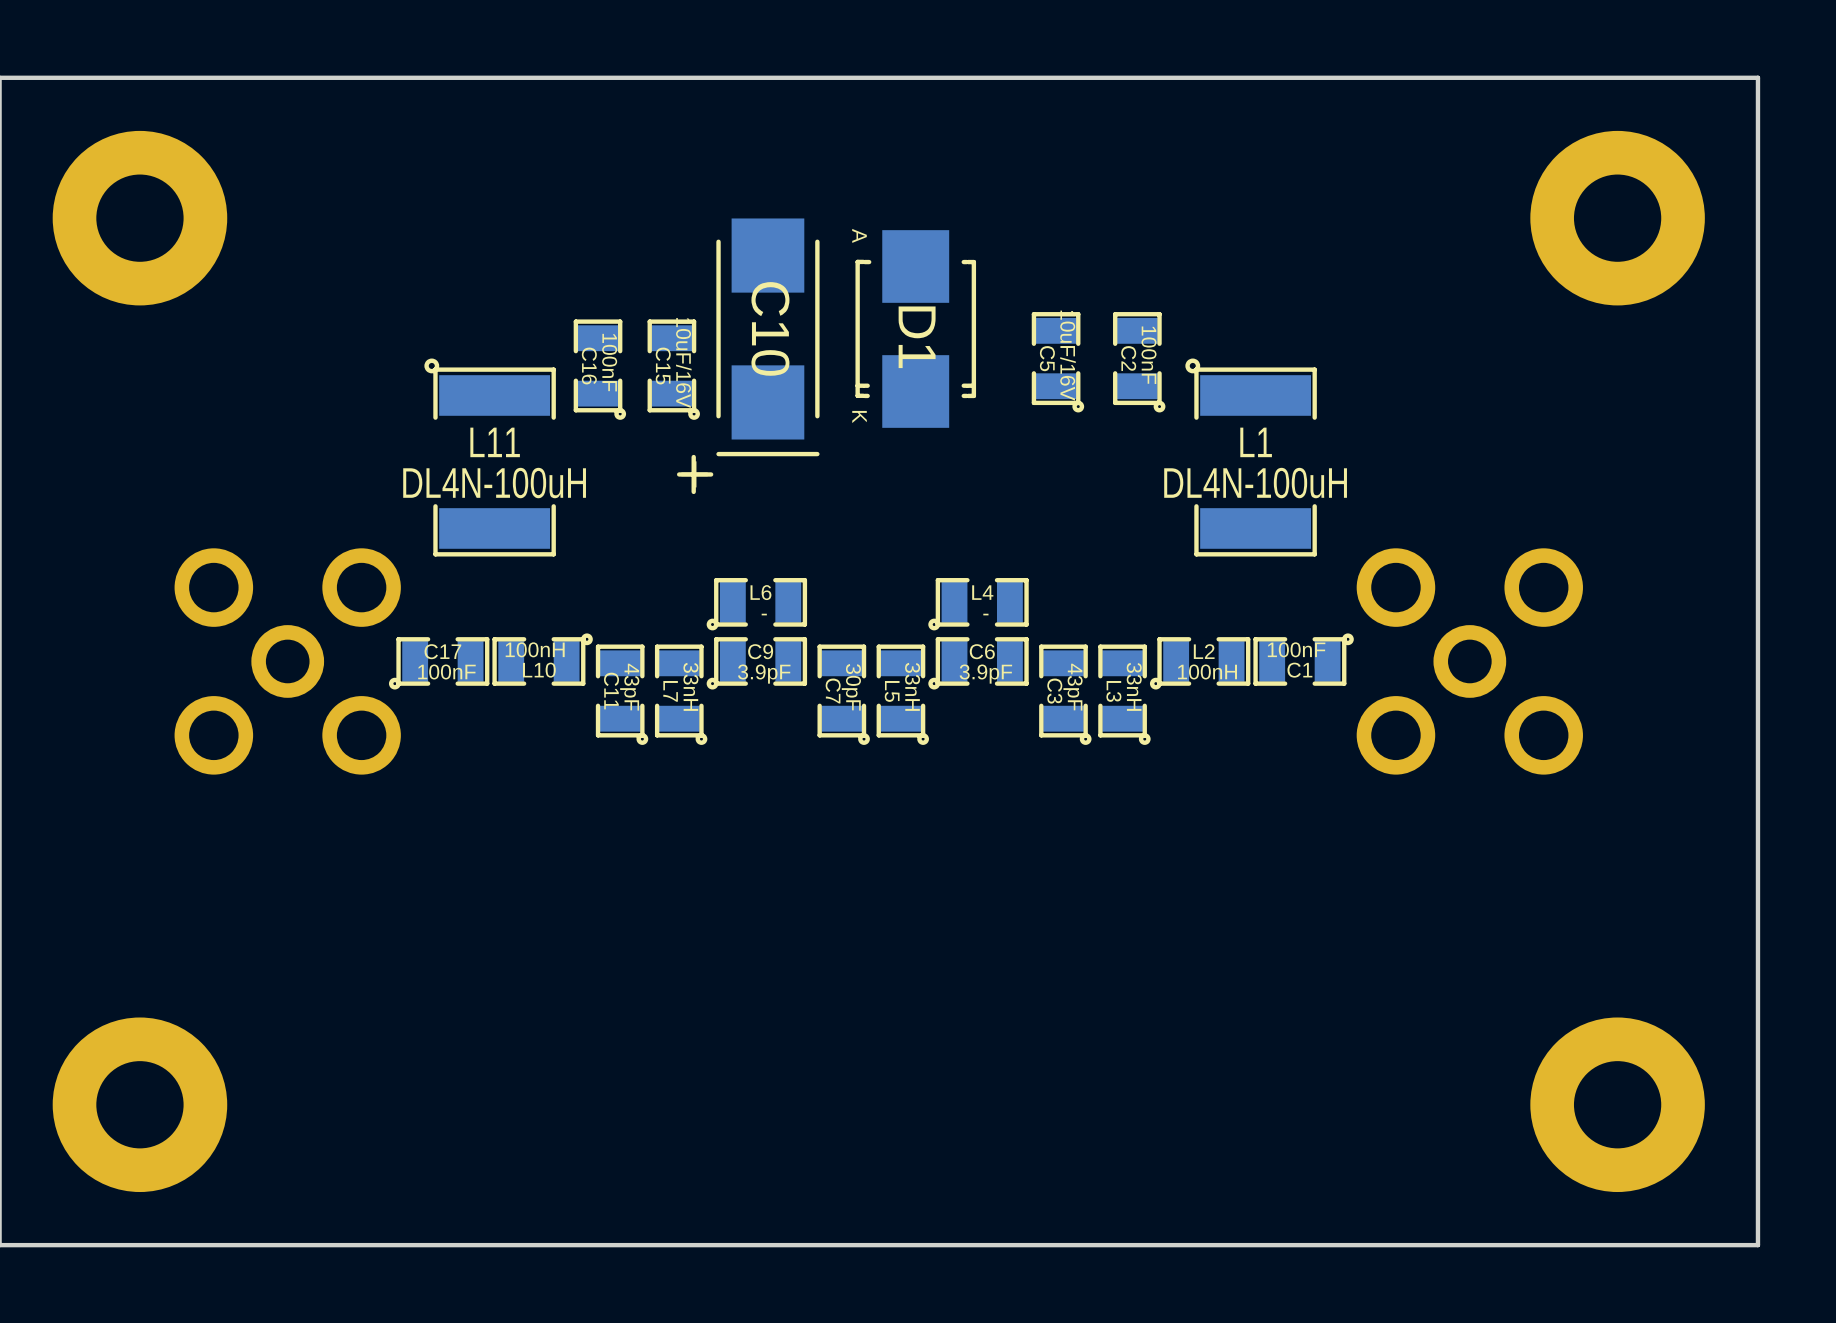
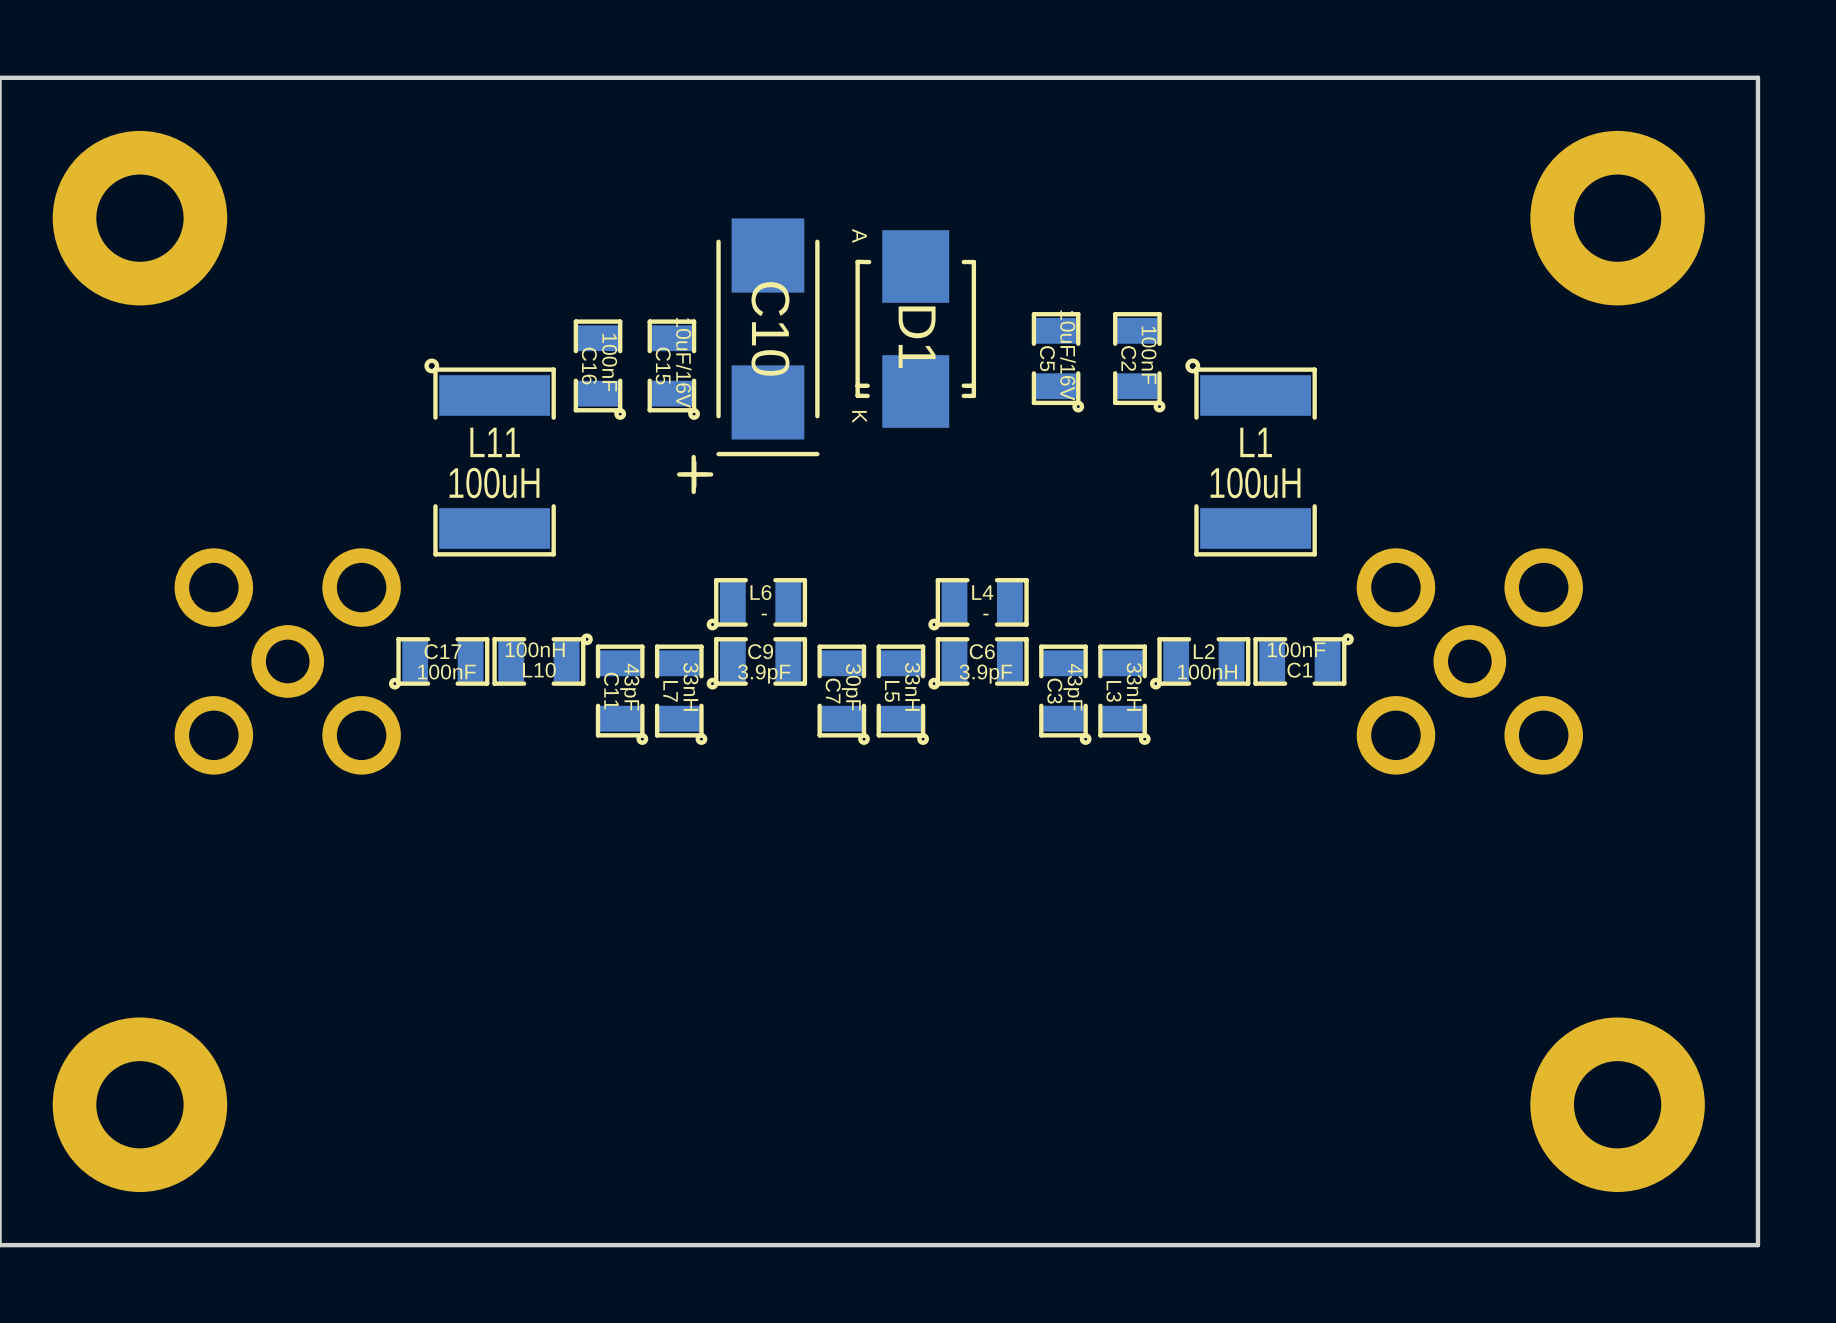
L11 value: DL4N-100uH (494, 483) -> 100uH (494, 483)
L1 value: DL4N-100uH (1255, 483) -> 100uH (1255, 483)

